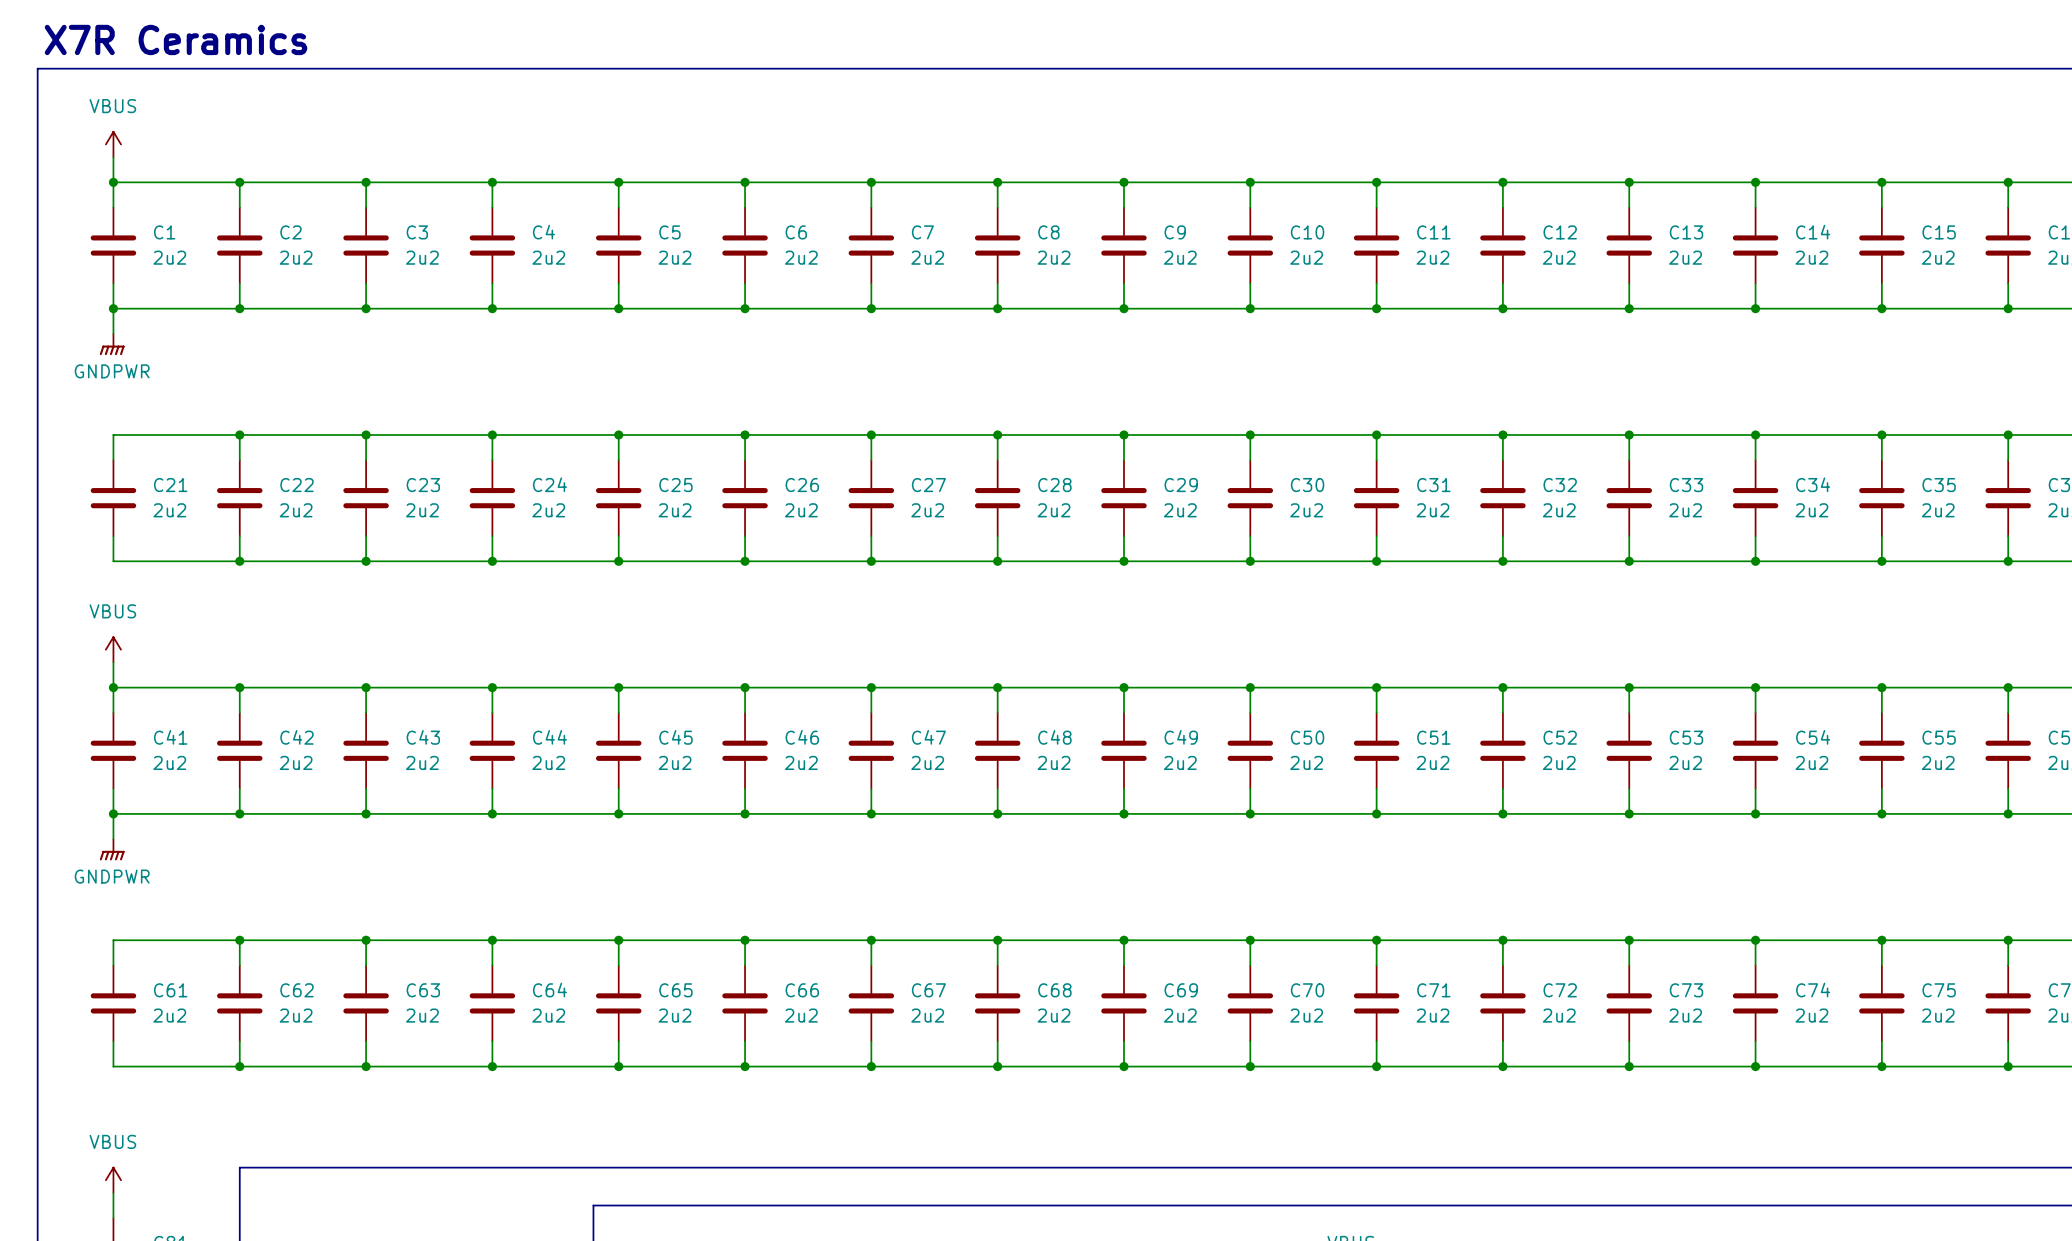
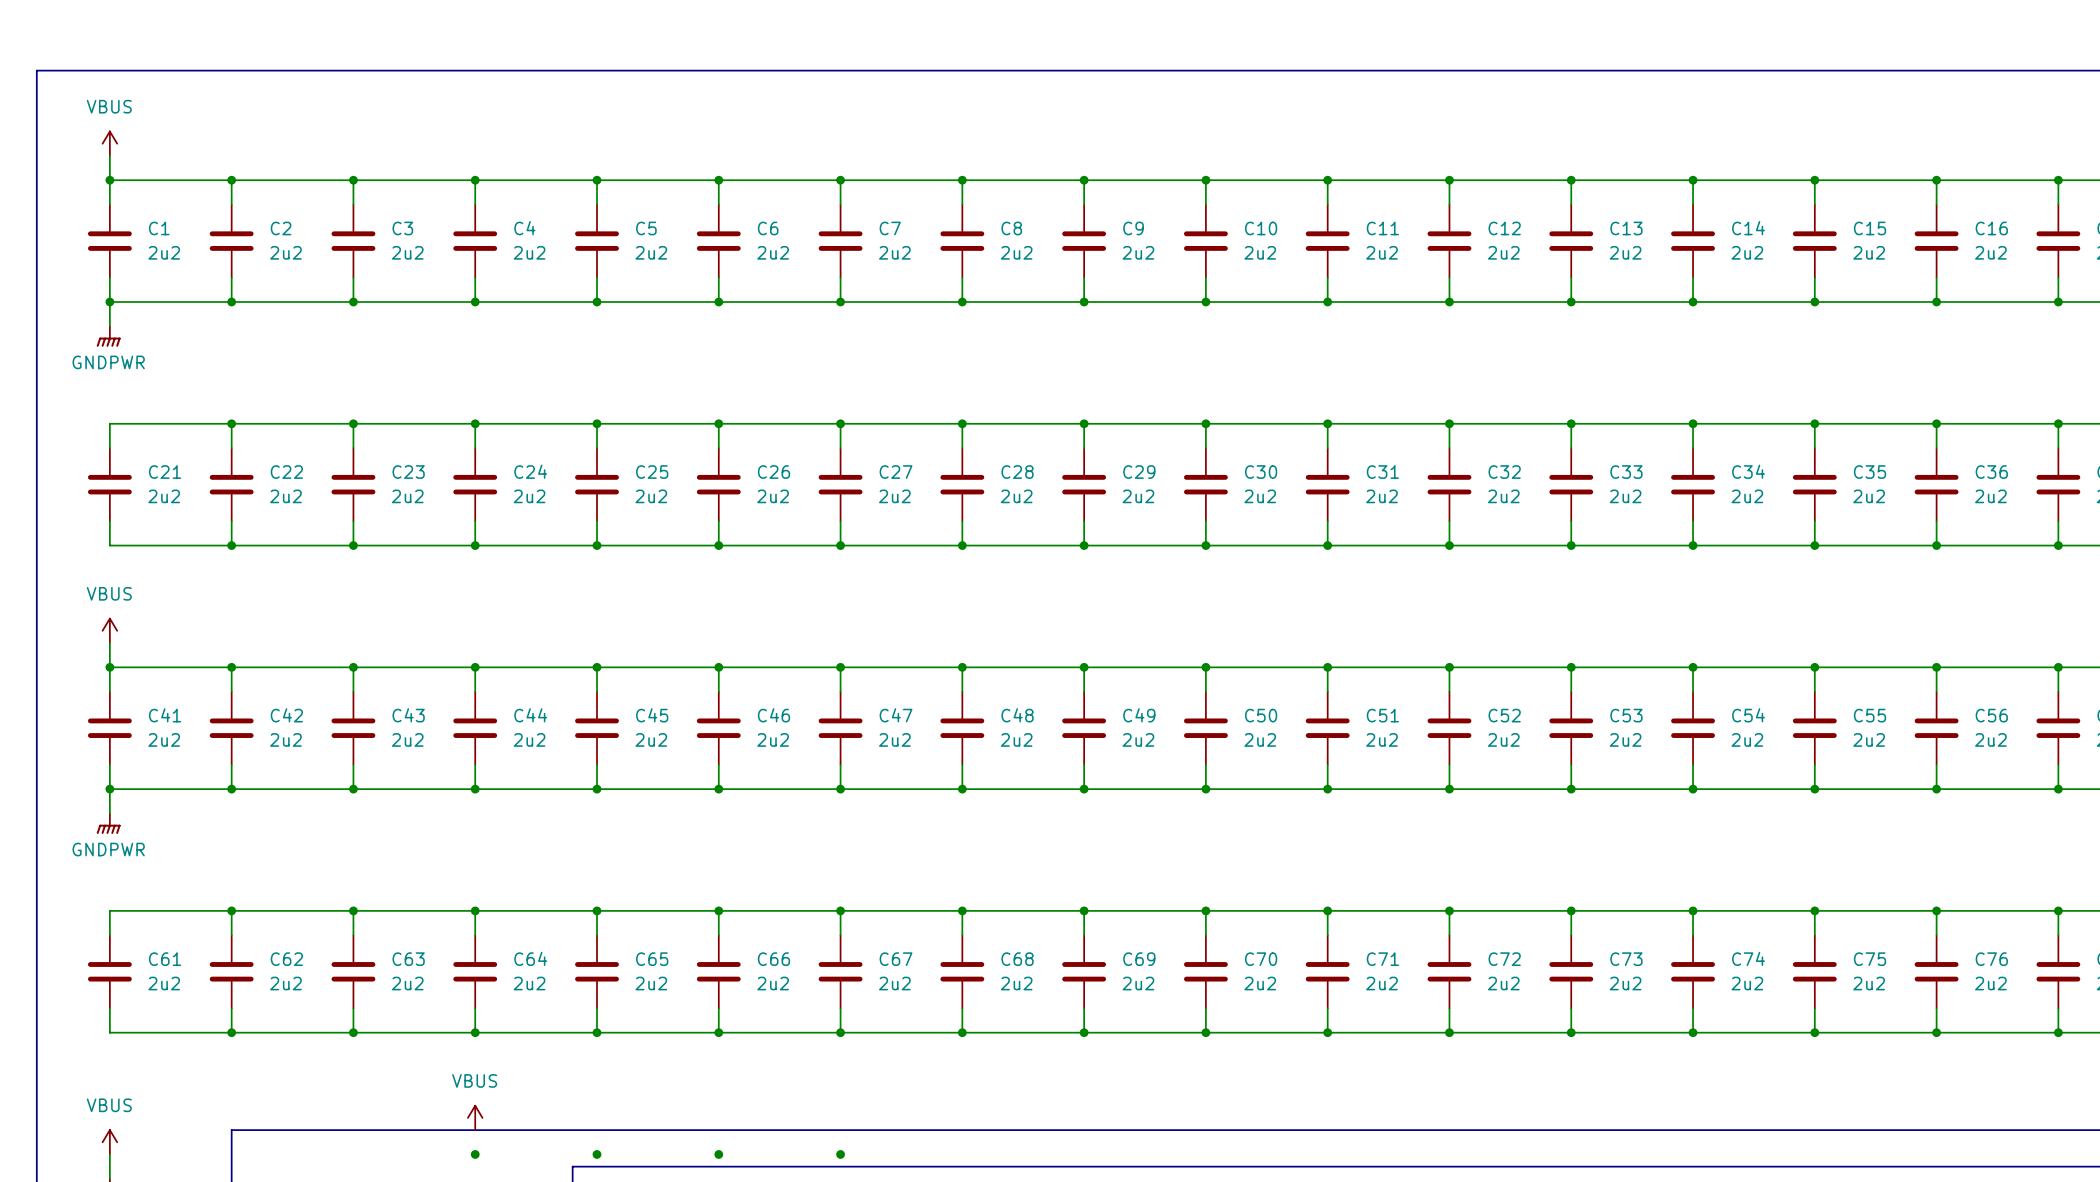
text: X7R Ceramics (176, 39) -> none
power symbol: none -> VBUS (475, 1117)
junction: none -> (475, 1154)
junction: none -> (597, 1154)
junction: none -> (718, 1154)
junction: none -> (840, 1154)

